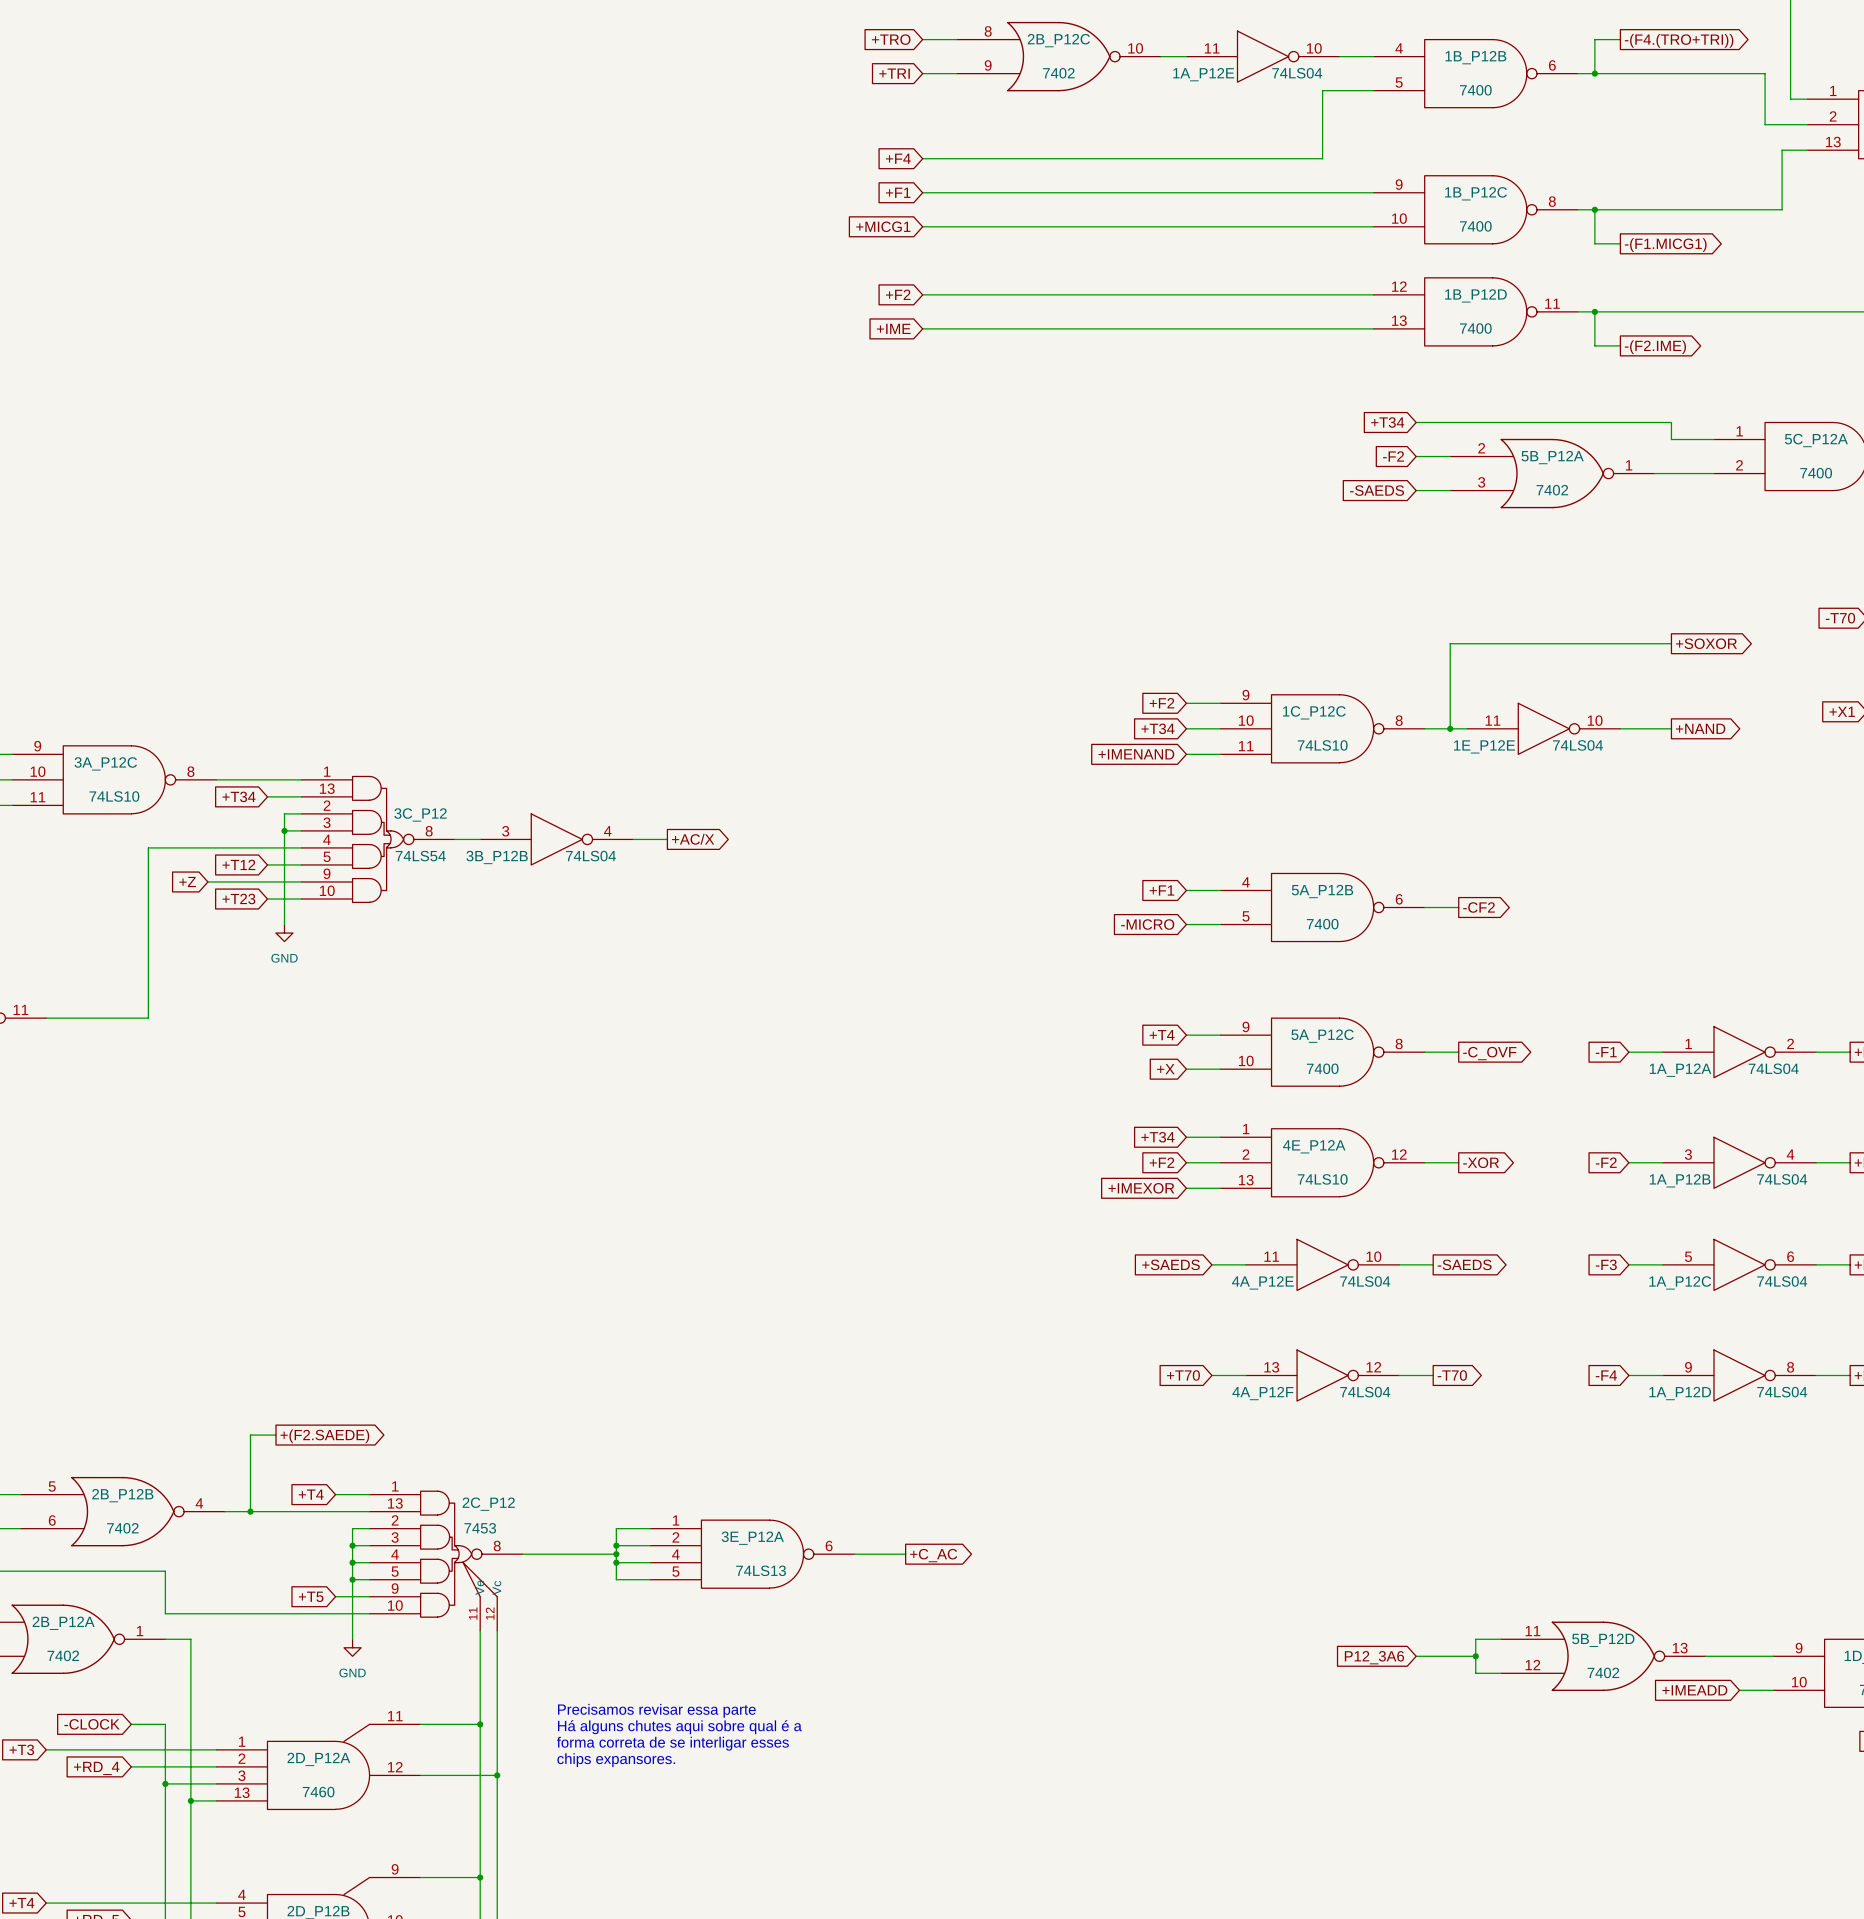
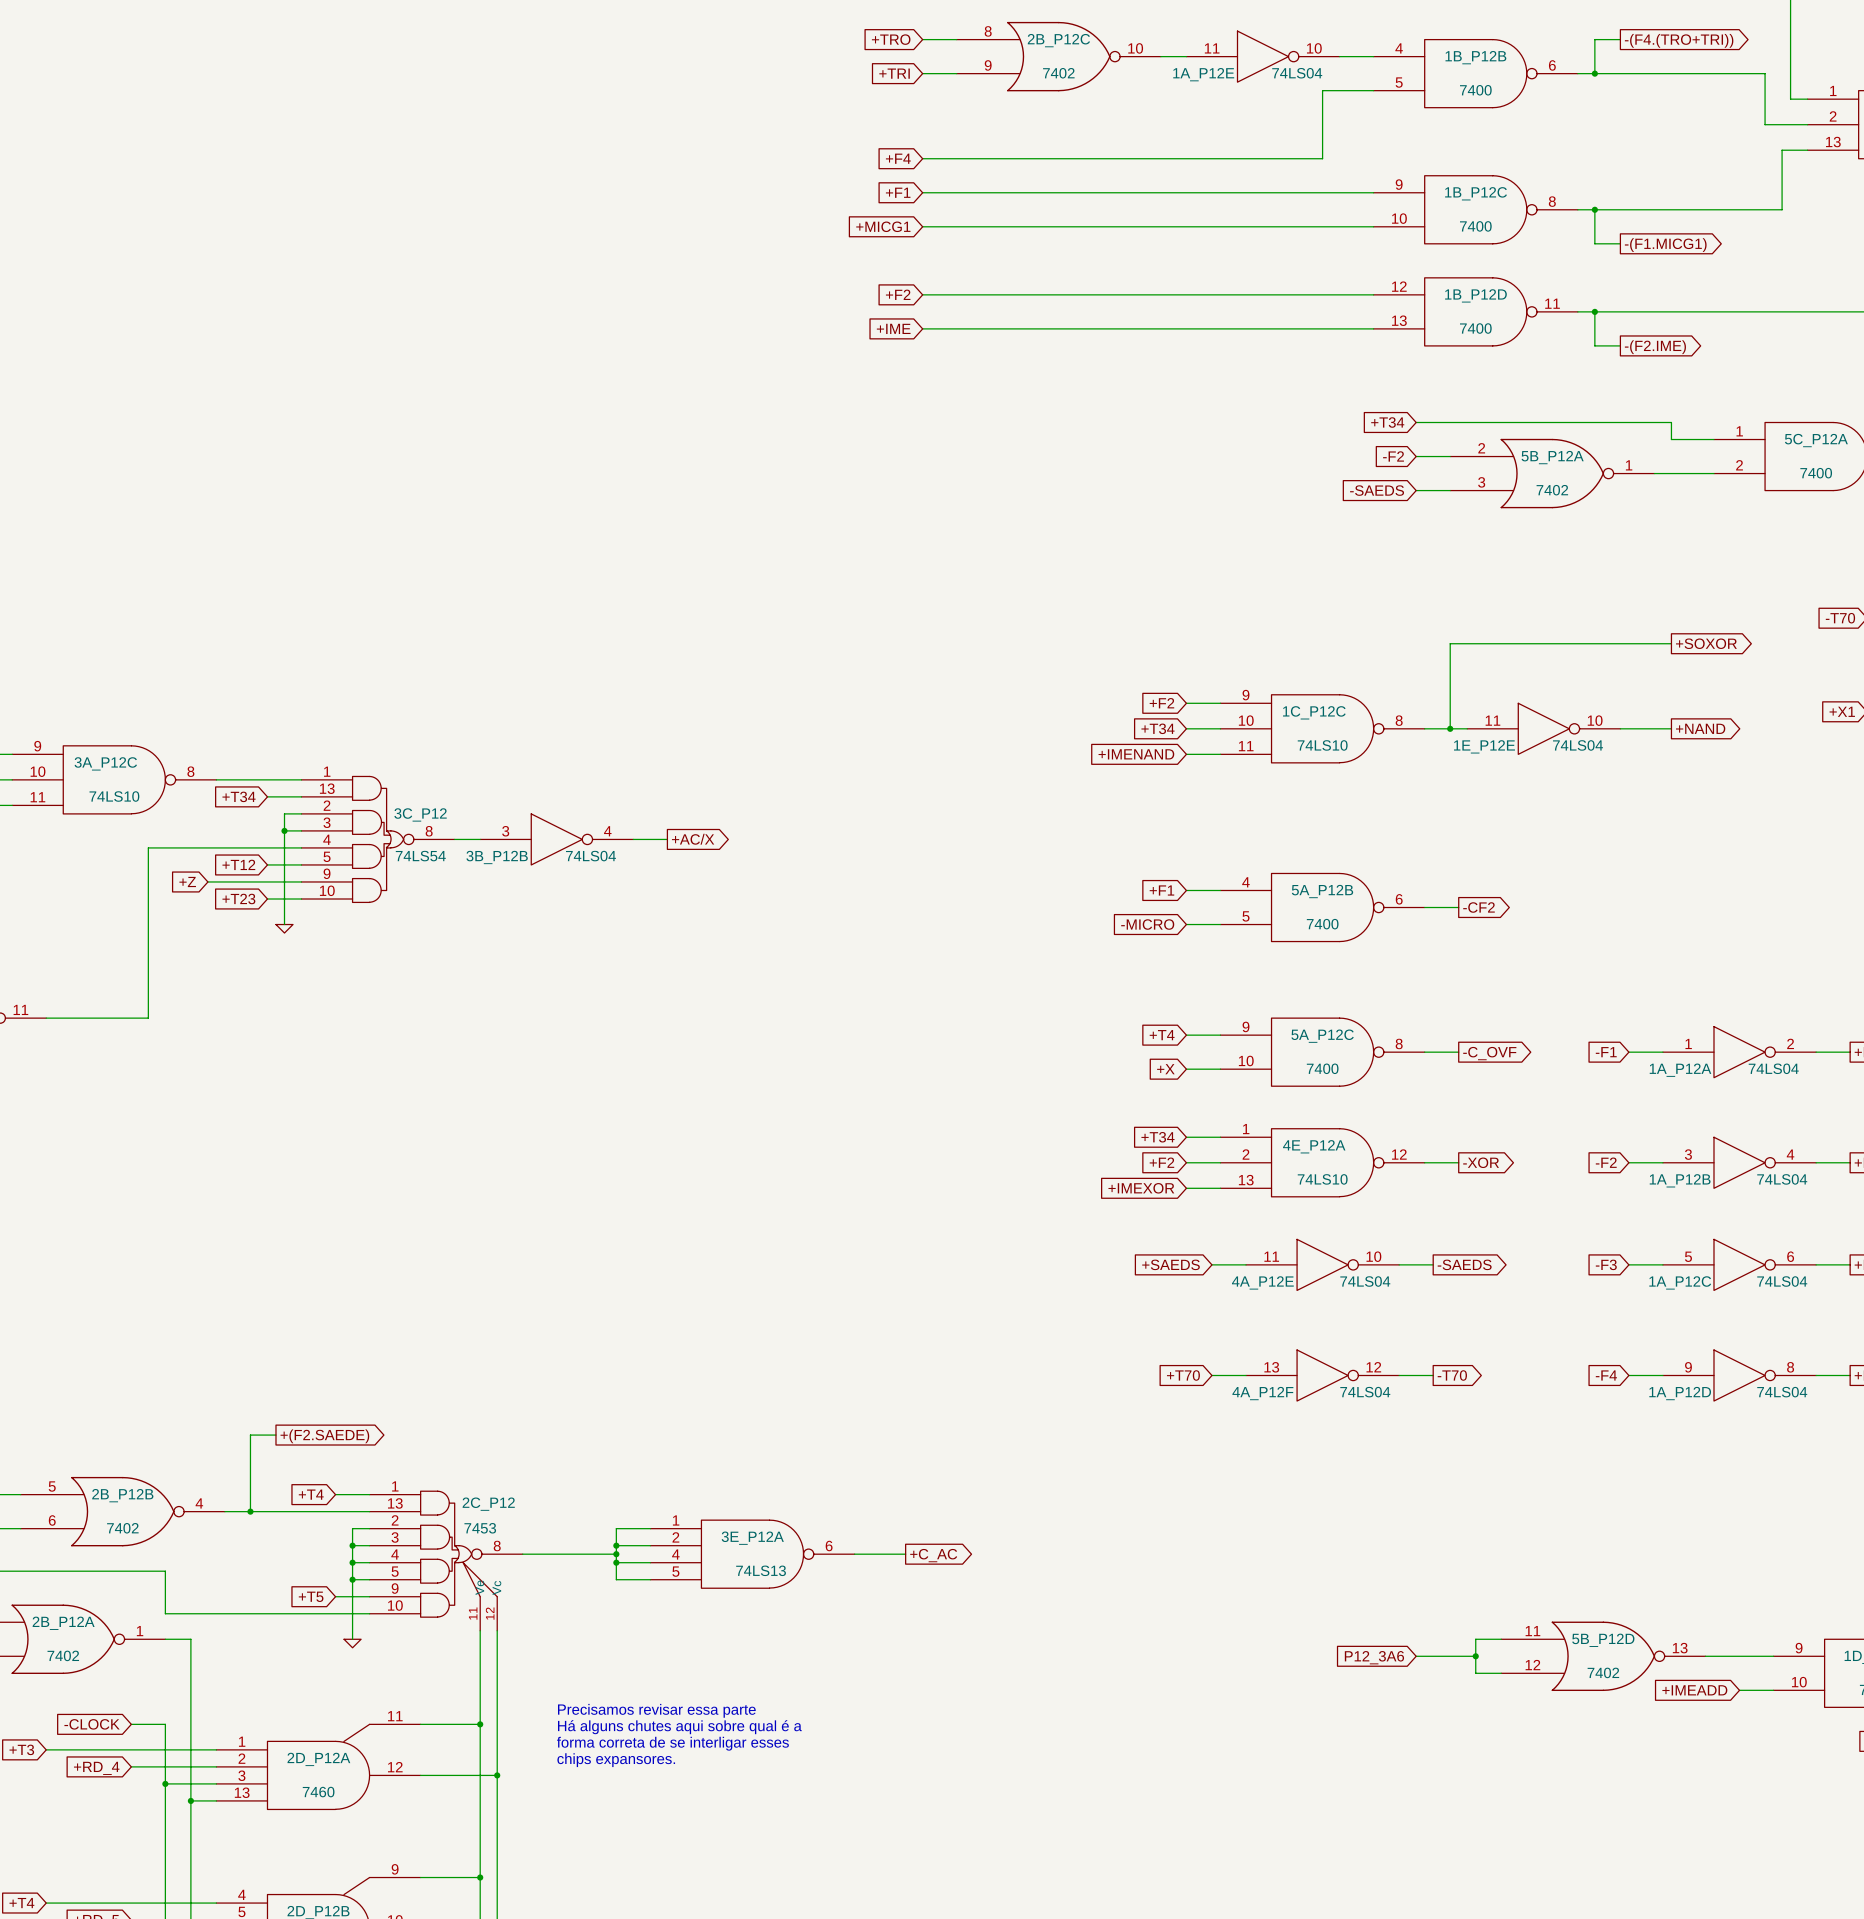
power symbol shape: [275, 924, 294, 942] -> [275, 924, 294, 934]
power symbol text: GND (284, 958) -> none
power symbol shape: [344, 1639, 362, 1657] -> [344, 1639, 362, 1648]
power symbol text: GND (352, 1672) -> none

